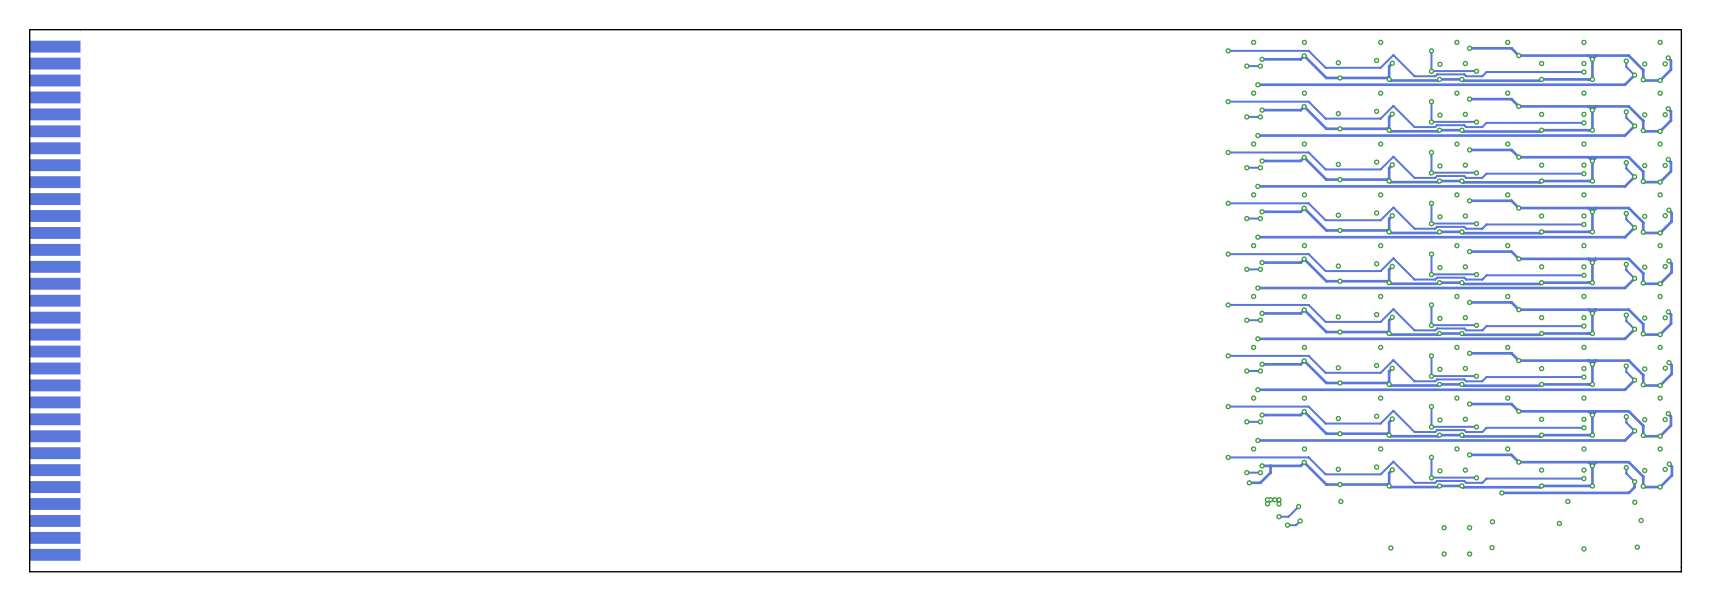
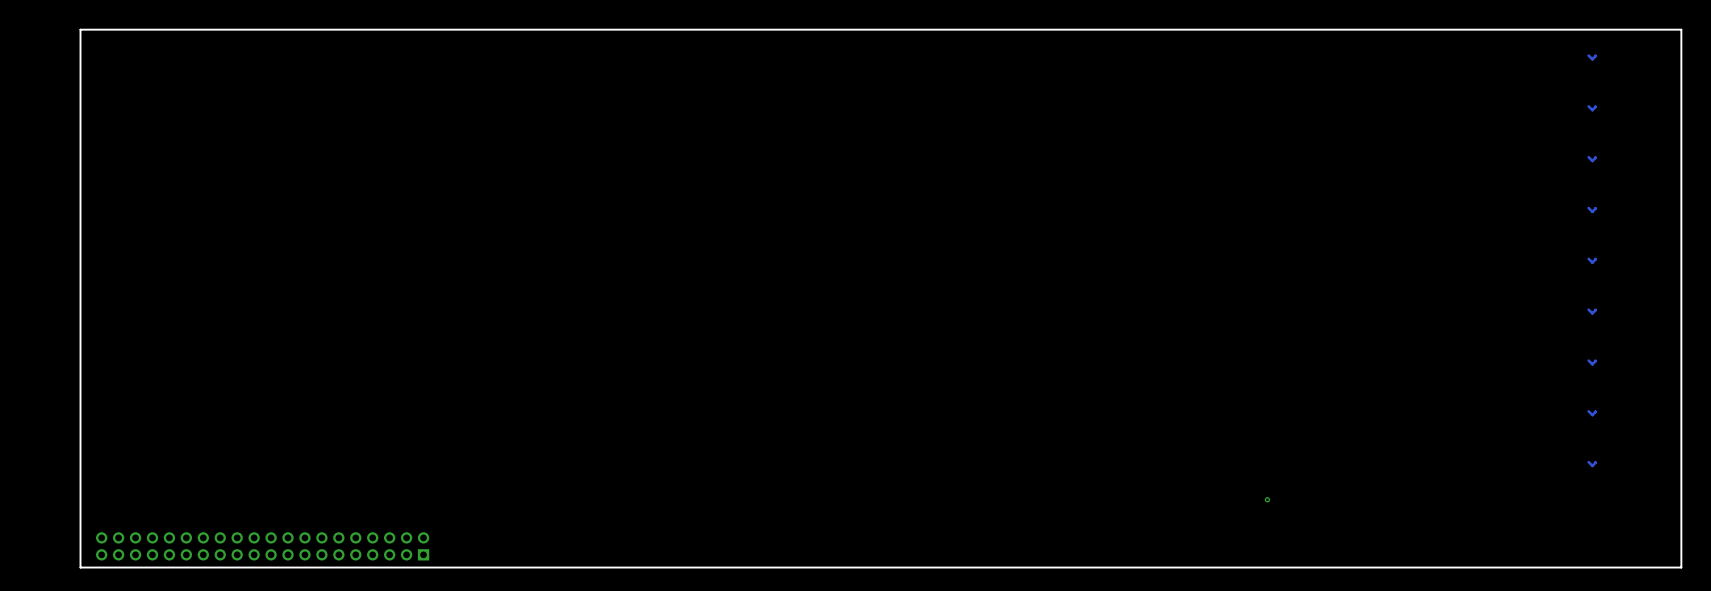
board edge: (80, 29) (29, 29) (29, 571) (1681, 571) (1681, 567) -> (80, 29) (80, 567) (1681, 567)
via: (1253, 42) -> none
via: (1304, 42) -> none
via: (1380, 42) -> none
via: (1456, 42) -> none
via: (1507, 42) -> none
via: (1583, 42) -> none
via: (1660, 42) -> none
track: (1469, 48) (1511, 48) (1518, 55) (1628, 55) (1643, 70) (1644, 80) (1660, 80) (1670, 69) (1670, 60) (1668, 57) -> none
via: (1469, 48) -> none
track: (1228, 50) (1308, 50) (1325, 67) (1380, 67) (1393, 55) (1414, 76) (1435, 76) (1437, 74) (1482, 76) (1486, 72) (1583, 72) -> none
via: (1228, 50) -> none
track: (1431, 50) (1431, 71) (1476, 71) -> none
via: (1431, 50) -> none
via: (1304, 55) -> none
via: (1518, 55) -> none
via: (1668, 57) -> none
via: (1262, 59) -> none
track: (1592, 59) (1592, 79) (1540, 80) (1390, 80) (1387, 77) (1326, 77) (1304, 55) (1300, 59) (1262, 59) -> none
via: (1592, 59) -> none
via: (1376, 60) -> none
track: (1626, 61) (1626, 66) (1634, 75) (1625, 84) (1257, 84) -> none
via: (1626, 61) -> none
via: (1338, 62) -> none
track: (1392, 63) (1389, 66) (1389, 79) -> none
via: (1392, 63) -> none
via: (1465, 63) -> none
via: (1541, 63) -> none
via: (1583, 63) -> none
via: (1644, 63) -> none
via: (1665, 63) -> none
via: (1439, 64) -> none
via: (1246, 66) -> none
track: (1260, 66) (1246, 66) -> none
via: (1260, 66) -> none
via: (1431, 71) -> none
via: (1476, 71) -> none
via: (1583, 72) -> none
via: (1634, 75) -> none
via: (1340, 77) -> none
via: (1389, 79) -> none
via: (1439, 79) -> none
via: (1461, 79) -> none
via: (1541, 79) -> none
via: (1592, 79) -> none
via: (1643, 79) -> none
via: (1660, 80) -> none
via: (1257, 84) -> none
via: (1253, 93) -> none
via: (1304, 93) -> none
via: (1380, 93) -> none
via: (1456, 93) -> none
via: (1507, 93) -> none
via: (1583, 93) -> none
via: (1660, 93) -> none
track: (1469, 99) (1511, 99) (1518, 106) (1628, 106) (1643, 120) (1644, 131) (1660, 131) (1670, 120) (1670, 111) (1668, 108) -> none
via: (1469, 99) -> none
track: (1228, 101) (1308, 101) (1325, 118) (1380, 118) (1393, 105) (1414, 127) (1435, 127) (1437, 125) (1482, 127) (1486, 122) (1583, 122) -> none
via: (1228, 101) -> none
track: (1431, 101) (1431, 122) (1476, 122) -> none
via: (1431, 101) -> none
via: (1304, 106) -> none
via: (1518, 106) -> none
via: (1668, 108) -> none
via: (1262, 110) -> none
track: (1592, 110) (1592, 130) (1540, 131) (1390, 131) (1387, 128) (1326, 128) (1304, 106) (1300, 110) (1262, 110) -> none
via: (1592, 110) -> none
via: (1376, 111) -> none
track: (1626, 111) (1626, 117) (1634, 125) (1625, 135) (1257, 135) -> none
via: (1626, 111) -> none
via: (1338, 113) -> none
track: (1392, 114) (1389, 117) (1389, 130) -> none
via: (1392, 114) -> none
via: (1465, 114) -> none
via: (1541, 114) -> none
via: (1583, 114) -> none
via: (1644, 114) -> none
via: (1665, 114) -> none
via: (1439, 115) -> none
via: (1246, 116) -> none
track: (1260, 116) (1246, 116) -> none
via: (1260, 116) -> none
via: (1431, 122) -> none
via: (1476, 122) -> none
via: (1583, 122) -> none
via: (1634, 125) -> none
via: (1340, 128) -> none
via: (1389, 130) -> none
via: (1439, 130) -> none
via: (1461, 130) -> none
via: (1541, 130) -> none
via: (1592, 130) -> none
via: (1643, 130) -> none
via: (1660, 131) -> none
via: (1257, 135) -> none
via: (1253, 144) -> none
via: (1304, 144) -> none
via: (1380, 144) -> none
via: (1456, 144) -> none
via: (1507, 144) -> none
via: (1583, 144) -> none
via: (1660, 144) -> none
track: (1469, 149) (1511, 149) (1518, 157) (1628, 157) (1643, 171) (1644, 182) (1660, 182) (1670, 171) (1670, 162) (1668, 159) -> none
via: (1469, 149) -> none
track: (1228, 152) (1308, 152) (1325, 169) (1380, 169) (1393, 156) (1414, 177) (1435, 177) (1437, 176) (1482, 177) (1486, 173) (1583, 173) -> none
via: (1228, 152) -> none
track: (1431, 152) (1431, 172) (1476, 172) -> none
via: (1431, 152) -> none
via: (1304, 157) -> none
via: (1518, 157) -> none
via: (1668, 159) -> none
via: (1262, 160) -> none
track: (1592, 160) (1592, 181) (1540, 182) (1390, 182) (1387, 179) (1326, 179) (1304, 157) (1300, 160) (1262, 160) -> none
via: (1592, 160) -> none
via: (1376, 162) -> none
track: (1626, 162) (1626, 168) (1634, 176) (1625, 186) (1257, 186) -> none
via: (1626, 162) -> none
via: (1338, 164) -> none
track: (1392, 164) (1389, 168) (1389, 181) -> none
via: (1392, 164) -> none
via: (1439, 165) -> none
via: (1465, 165) -> none
via: (1541, 165) -> none
via: (1583, 165) -> none
via: (1644, 165) -> none
via: (1665, 165) -> none
via: (1246, 167) -> none
track: (1260, 167) (1246, 167) -> none
via: (1260, 167) -> none
via: (1431, 172) -> none
via: (1476, 172) -> none
via: (1583, 173) -> none
via: (1634, 176) -> none
via: (1340, 179) -> none
via: (1389, 181) -> none
via: (1439, 181) -> none
via: (1461, 181) -> none
via: (1541, 181) -> none
via: (1592, 181) -> none
via: (1643, 181) -> none
via: (1660, 182) -> none
via: (1257, 186) -> none
via: (1253, 194) -> none
via: (1304, 194) -> none
via: (1380, 194) -> none
via: (1456, 194) -> none
via: (1507, 194) -> none
via: (1583, 194) -> none
via: (1660, 194) -> none
track: (1469, 200) (1511, 200) (1518, 208) (1628, 208) (1643, 222) (1644, 232) (1660, 232) (1671, 221) (1671, 212) (1668, 210) -> none
via: (1469, 200) -> none
track: (1228, 203) (1308, 203) (1325, 220) (1380, 220) (1393, 207) (1414, 228) (1435, 228) (1437, 226) (1482, 228) (1486, 224) (1583, 224) -> none
via: (1228, 203) -> none
track: (1431, 203) (1431, 223) (1476, 223) -> none
via: (1431, 203) -> none
via: (1304, 208) -> none
via: (1518, 208) -> none
via: (1668, 210) -> none
via: (1262, 211) -> none
track: (1592, 211) (1592, 231) (1540, 233) (1390, 232) (1387, 230) (1326, 230) (1304, 208) (1300, 211) (1262, 211) -> none
via: (1592, 211) -> none
via: (1376, 212) -> none
track: (1626, 213) (1626, 219) (1634, 227) (1625, 237) (1257, 237) -> none
via: (1626, 213) -> none
via: (1338, 215) -> none
track: (1392, 215) (1389, 218) (1389, 231) -> none
via: (1392, 215) -> none
via: (1665, 215) -> none
via: (1439, 216) -> none
via: (1465, 216) -> none
via: (1541, 216) -> none
via: (1583, 216) -> none
via: (1644, 216) -> none
via: (1246, 218) -> none
track: (1260, 218) (1246, 218) -> none
via: (1260, 218) -> none
via: (1431, 223) -> none
via: (1476, 223) -> none
via: (1583, 224) -> none
via: (1634, 227) -> none
via: (1340, 230) -> none
via: (1389, 231) -> none
via: (1439, 231) -> none
via: (1461, 231) -> none
via: (1541, 231) -> none
via: (1592, 231) -> none
via: (1643, 232) -> none
via: (1660, 232) -> none
via: (1257, 237) -> none
via: (1253, 245) -> none
via: (1304, 245) -> none
via: (1380, 245) -> none
via: (1456, 245) -> none
via: (1507, 245) -> none
via: (1583, 245) -> none
via: (1660, 245) -> none
track: (1469, 251) (1511, 251) (1518, 258) (1628, 258) (1643, 273) (1644, 283) (1660, 283) (1671, 272) (1671, 263) (1668, 261) -> none
via: (1469, 251) -> none
track: (1228, 254) (1308, 254) (1325, 271) (1380, 271) (1393, 258) (1414, 279) (1435, 279) (1437, 277) (1482, 279) (1486, 275) (1583, 275) -> none
via: (1228, 254) -> none
track: (1431, 254) (1431, 274) (1476, 274) -> none
via: (1431, 254) -> none
via: (1518, 258) -> none
via: (1304, 259) -> none
via: (1668, 261) -> none
via: (1262, 262) -> none
track: (1592, 262) (1592, 282) (1540, 283) (1390, 283) (1387, 281) (1326, 281) (1304, 259) (1300, 262) (1262, 262) -> none
via: (1592, 262) -> none
via: (1376, 263) -> none
track: (1626, 264) (1626, 270) (1634, 278) (1625, 288) (1257, 288) -> none
via: (1626, 264) -> none
via: (1338, 266) -> none
track: (1392, 266) (1389, 269) (1389, 282) -> none
via: (1392, 266) -> none
via: (1465, 266) -> none
via: (1541, 266) -> none
via: (1583, 266) -> none
via: (1665, 266) -> none
via: (1439, 267) -> none
via: (1644, 267) -> none
via: (1246, 269) -> none
track: (1260, 269) (1246, 269) -> none
via: (1260, 269) -> none
via: (1431, 274) -> none
via: (1476, 274) -> none
via: (1583, 275) -> none
via: (1634, 278) -> none
via: (1340, 281) -> none
via: (1389, 282) -> none
via: (1439, 282) -> none
via: (1461, 282) -> none
via: (1541, 282) -> none
via: (1592, 282) -> none
via: (1643, 283) -> none
via: (1660, 283) -> none
via: (1257, 288) -> none
via: (1253, 296) -> none
via: (1304, 296) -> none
via: (1380, 296) -> none
via: (1456, 296) -> none
via: (1507, 296) -> none
via: (1583, 296) -> none
via: (1660, 296) -> none
part: (55, 300) -> none
track: (1469, 302) (1511, 302) (1518, 309) (1628, 309) (1643, 324) (1644, 334) (1660, 334) (1671, 323) (1671, 314) (1668, 311) -> none
via: (1469, 302) -> none
track: (1228, 304) (1308, 304) (1325, 321) (1380, 321) (1393, 309) (1414, 330) (1435, 330) (1437, 328) (1482, 330) (1486, 326) (1583, 326) -> none
via: (1228, 304) -> none
track: (1431, 304) (1431, 325) (1476, 325) -> none
via: (1431, 304) -> none
via: (1304, 309) -> none
via: (1518, 309) -> none
via: (1668, 311) -> none
via: (1262, 313) -> none
track: (1592, 313) (1592, 333) (1540, 334) (1390, 334) (1387, 332) (1326, 332) (1304, 309) (1300, 313) (1262, 313) -> none
via: (1592, 313) -> none
via: (1376, 314) -> none
track: (1626, 315) (1626, 320) (1634, 329) (1625, 338) (1257, 338) -> none
via: (1626, 315) -> none
via: (1338, 316) -> none
track: (1392, 317) (1389, 320) (1389, 333) -> none
via: (1392, 317) -> none
via: (1465, 317) -> none
via: (1541, 317) -> none
via: (1583, 317) -> none
via: (1665, 317) -> none
via: (1439, 318) -> none
via: (1644, 318) -> none
via: (1246, 320) -> none
track: (1260, 320) (1246, 320) -> none
via: (1260, 320) -> none
via: (1431, 325) -> none
via: (1476, 325) -> none
via: (1583, 326) -> none
via: (1634, 329) -> none
via: (1340, 332) -> none
via: (1389, 333) -> none
via: (1439, 333) -> none
via: (1461, 333) -> none
via: (1541, 333) -> none
via: (1592, 333) -> none
via: (1643, 333) -> none
via: (1660, 334) -> none
via: (1257, 338) -> none
via: (1253, 347) -> none
via: (1304, 347) -> none
via: (1380, 347) -> none
via: (1456, 347) -> none
via: (1507, 347) -> none
via: (1583, 347) -> none
via: (1660, 347) -> none
track: (1469, 353) (1511, 353) (1518, 360) (1628, 360) (1643, 375) (1644, 385) (1660, 385) (1671, 374) (1671, 365) (1668, 362) -> none
via: (1469, 353) -> none
track: (1228, 355) (1308, 355) (1325, 372) (1380, 372) (1393, 360) (1414, 381) (1435, 381) (1437, 379) (1482, 381) (1486, 377) (1583, 377) -> none
via: (1228, 355) -> none
track: (1431, 355) (1431, 376) (1476, 376) -> none
via: (1431, 355) -> none
via: (1304, 360) -> none
via: (1518, 360) -> none
via: (1668, 362) -> none
via: (1262, 364) -> none
track: (1592, 364) (1592, 384) (1540, 385) (1390, 385) (1387, 382) (1326, 382) (1304, 360) (1300, 364) (1262, 364) -> none
via: (1592, 364) -> none
via: (1376, 365) -> none
track: (1626, 366) (1626, 371) (1634, 380) (1625, 389) (1257, 389) -> none
via: (1626, 366) -> none
via: (1338, 367) -> none
track: (1392, 368) (1389, 371) (1389, 384) -> none
via: (1392, 368) -> none
via: (1465, 368) -> none
via: (1541, 368) -> none
via: (1583, 368) -> none
via: (1644, 368) -> none
via: (1665, 368) -> none
via: (1439, 369) -> none
via: (1246, 371) -> none
track: (1260, 371) (1246, 371) -> none
via: (1260, 371) -> none
via: (1431, 376) -> none
via: (1476, 376) -> none
via: (1583, 377) -> none
via: (1634, 380) -> none
via: (1340, 382) -> none
via: (1389, 384) -> none
via: (1439, 384) -> none
via: (1461, 384) -> none
via: (1541, 384) -> none
via: (1592, 384) -> none
via: (1643, 384) -> none
via: (1660, 385) -> none
via: (1257, 389) -> none
via: (1253, 398) -> none
via: (1304, 398) -> none
via: (1380, 398) -> none
via: (1456, 398) -> none
via: (1507, 398) -> none
via: (1583, 398) -> none
via: (1660, 398) -> none
track: (1469, 404) (1511, 404) (1518, 411) (1628, 411) (1643, 425) (1644, 436) (1660, 436) (1670, 425) (1670, 416) (1668, 413) -> none
via: (1469, 404) -> none
track: (1228, 406) (1308, 406) (1325, 423) (1380, 423) (1393, 410) (1414, 432) (1435, 432) (1437, 430) (1482, 432) (1486, 427) (1583, 427) -> none
via: (1228, 406) -> none
track: (1431, 406) (1431, 427) (1476, 427) -> none
via: (1431, 406) -> none
via: (1304, 411) -> none
via: (1518, 411) -> none
via: (1668, 413) -> none
via: (1262, 415) -> none
track: (1592, 415) (1592, 435) (1540, 436) (1390, 436) (1387, 433) (1326, 433) (1304, 411) (1300, 415) (1262, 415) -> none
via: (1592, 415) -> none
via: (1376, 416) -> none
track: (1626, 416) (1626, 422) (1634, 430) (1625, 440) (1257, 440) -> none
via: (1626, 416) -> none
via: (1338, 418) -> none
track: (1392, 418) (1389, 422) (1389, 435) -> none
via: (1392, 418) -> none
via: (1465, 419) -> none
via: (1541, 419) -> none
via: (1583, 419) -> none
via: (1644, 419) -> none
via: (1665, 419) -> none
via: (1439, 420) -> none
via: (1246, 421) -> none
track: (1260, 421) (1246, 421) -> none
via: (1260, 421) -> none
via: (1431, 427) -> none
via: (1476, 427) -> none
via: (1583, 427) -> none
via: (1634, 430) -> none
via: (1340, 433) -> none
via: (1389, 435) -> none
via: (1439, 435) -> none
via: (1461, 435) -> none
via: (1541, 435) -> none
via: (1592, 435) -> none
via: (1643, 435) -> none
via: (1660, 436) -> none
via: (1257, 440) -> none
via: (1253, 448) -> none
via: (1304, 448) -> none
via: (1380, 448) -> none
via: (1456, 448) -> none
via: (1507, 448) -> none
via: (1583, 448) -> none
via: (1660, 448) -> none
track: (1469, 454) (1511, 454) (1518, 462) (1628, 462) (1643, 476) (1644, 487) (1660, 487) (1671, 475) (1671, 466) (1669, 464) -> none
via: (1469, 454) -> none
track: (1228, 457) (1308, 457) (1325, 474) (1380, 474) (1393, 461) (1414, 482) (1435, 482) (1437, 480) (1482, 482) (1486, 478) (1583, 478) -> none
via: (1228, 457) -> none
track: (1431, 457) (1431, 477) (1476, 477) -> none
via: (1431, 457) -> none
via: (1304, 462) -> none
via: (1518, 462) -> none
via: (1669, 464) -> none
via: (1262, 465) -> none
track: (1270, 465) (1270, 472) (1260, 482) (1249, 482) -> none
track: (1592, 465) (1592, 485) (1540, 487) (1390, 487) (1387, 484) (1326, 484) (1304, 462) (1300, 465) (1262, 465) -> none
via: (1592, 465) -> none
via: (1376, 467) -> none
track: (1626, 467) (1626, 473) (1634, 481) (1634, 487) (1628, 492) (1501, 492) -> none
via: (1626, 467) -> none
via: (1338, 469) -> none
track: (1392, 469) (1389, 472) (1389, 485) -> none
via: (1392, 469) -> none
via: (1665, 469) -> none
via: (1439, 470) -> none
via: (1465, 470) -> none
via: (1541, 470) -> none
via: (1583, 470) -> none
via: (1644, 470) -> none
via: (1246, 472) -> none
track: (1260, 472) (1246, 472) -> none
via: (1260, 472) -> none
via: (1431, 477) -> none
via: (1476, 477) -> none
via: (1583, 478) -> none
via: (1634, 481) -> none
via: (1249, 482) -> none
via: (1340, 484) -> none
via: (1389, 485) -> none
via: (1439, 485) -> none
via: (1461, 485) -> none
via: (1541, 485) -> none
via: (1592, 485) -> none
via: (1643, 486) -> none
via: (1660, 487) -> none
via: (1501, 492) -> none
via: (1270, 499) -> none
via: (1274, 499) -> none
via: (1279, 499) -> none
via: (1340, 501) -> none
via: (1567, 501) -> none
via: (1634, 502) -> none
via: (1267, 503) -> none
via: (1279, 504) -> none
track: (1298, 506) (1288, 516) (1279, 516) -> none
via: (1298, 506) -> none
via: (1279, 516) -> none
track: (1300, 520) (1295, 525) (1287, 525) -> none
via: (1300, 520) -> none
via: (1641, 520) -> none
via: (1492, 521) -> none
via: (1559, 523) -> none
via: (1287, 525) -> none
via: (1444, 527) -> none
via: (1469, 527) -> none
part: none -> (262, 546)
via: (1492, 547) -> none
via: (1637, 547) -> none
via: (1390, 548) -> none
via: (1583, 548) -> none
via: (1444, 553) -> none
via: (1469, 553) -> none

